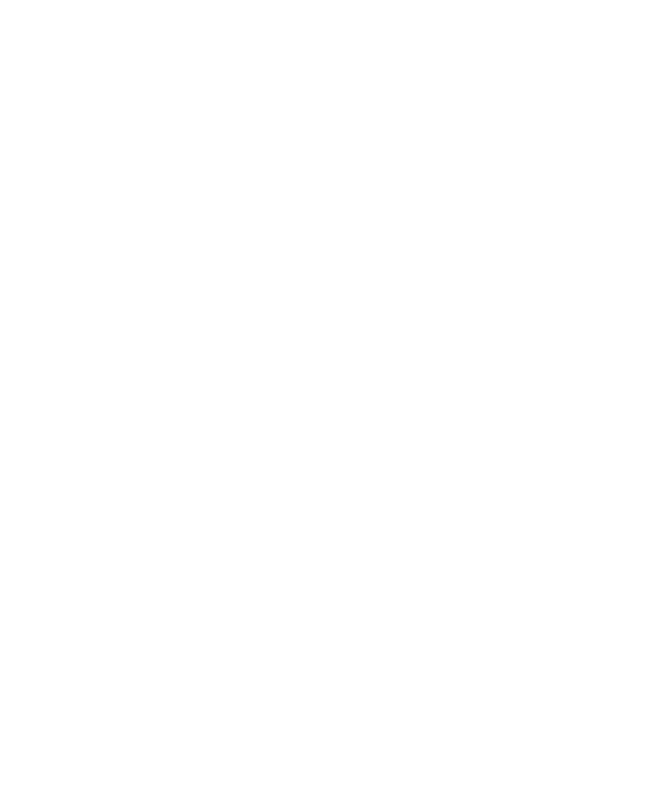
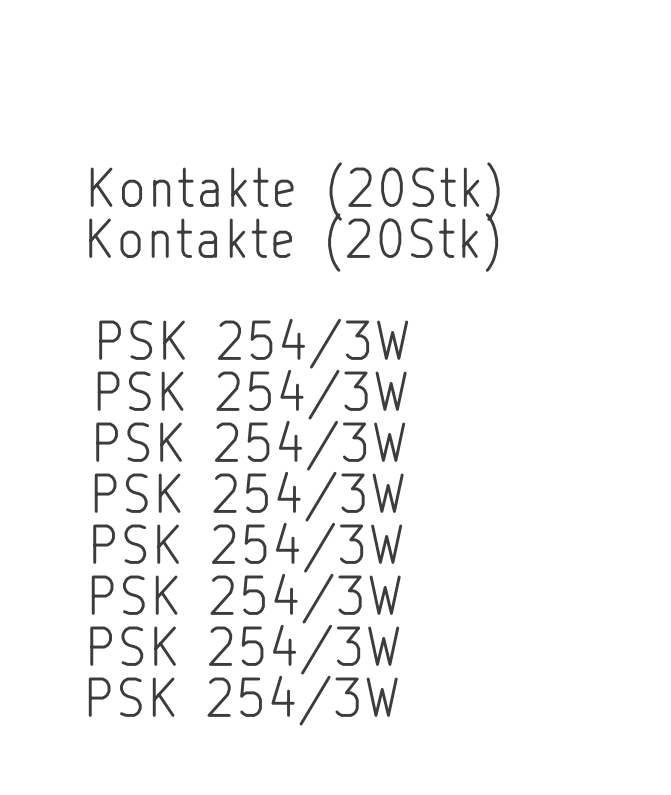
drawing: none -> [88, 162, 500, 726]

